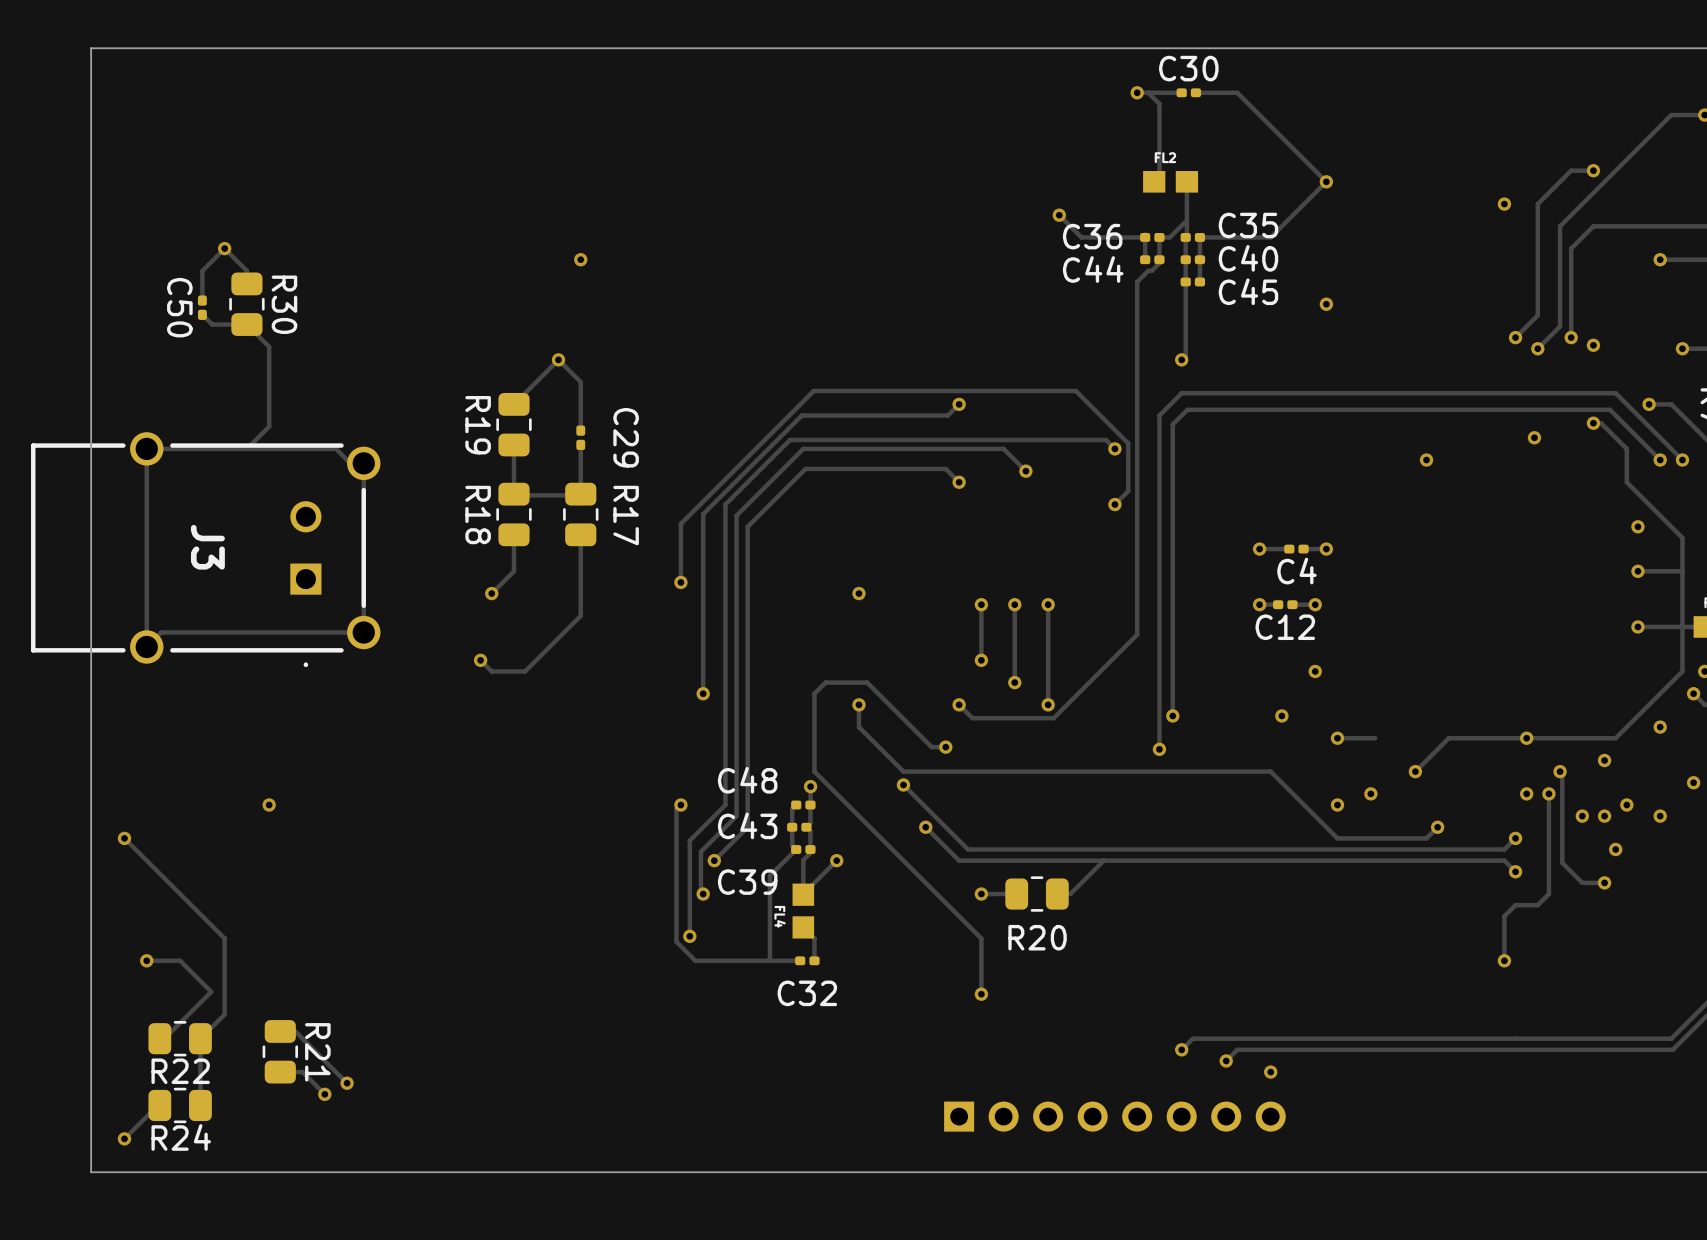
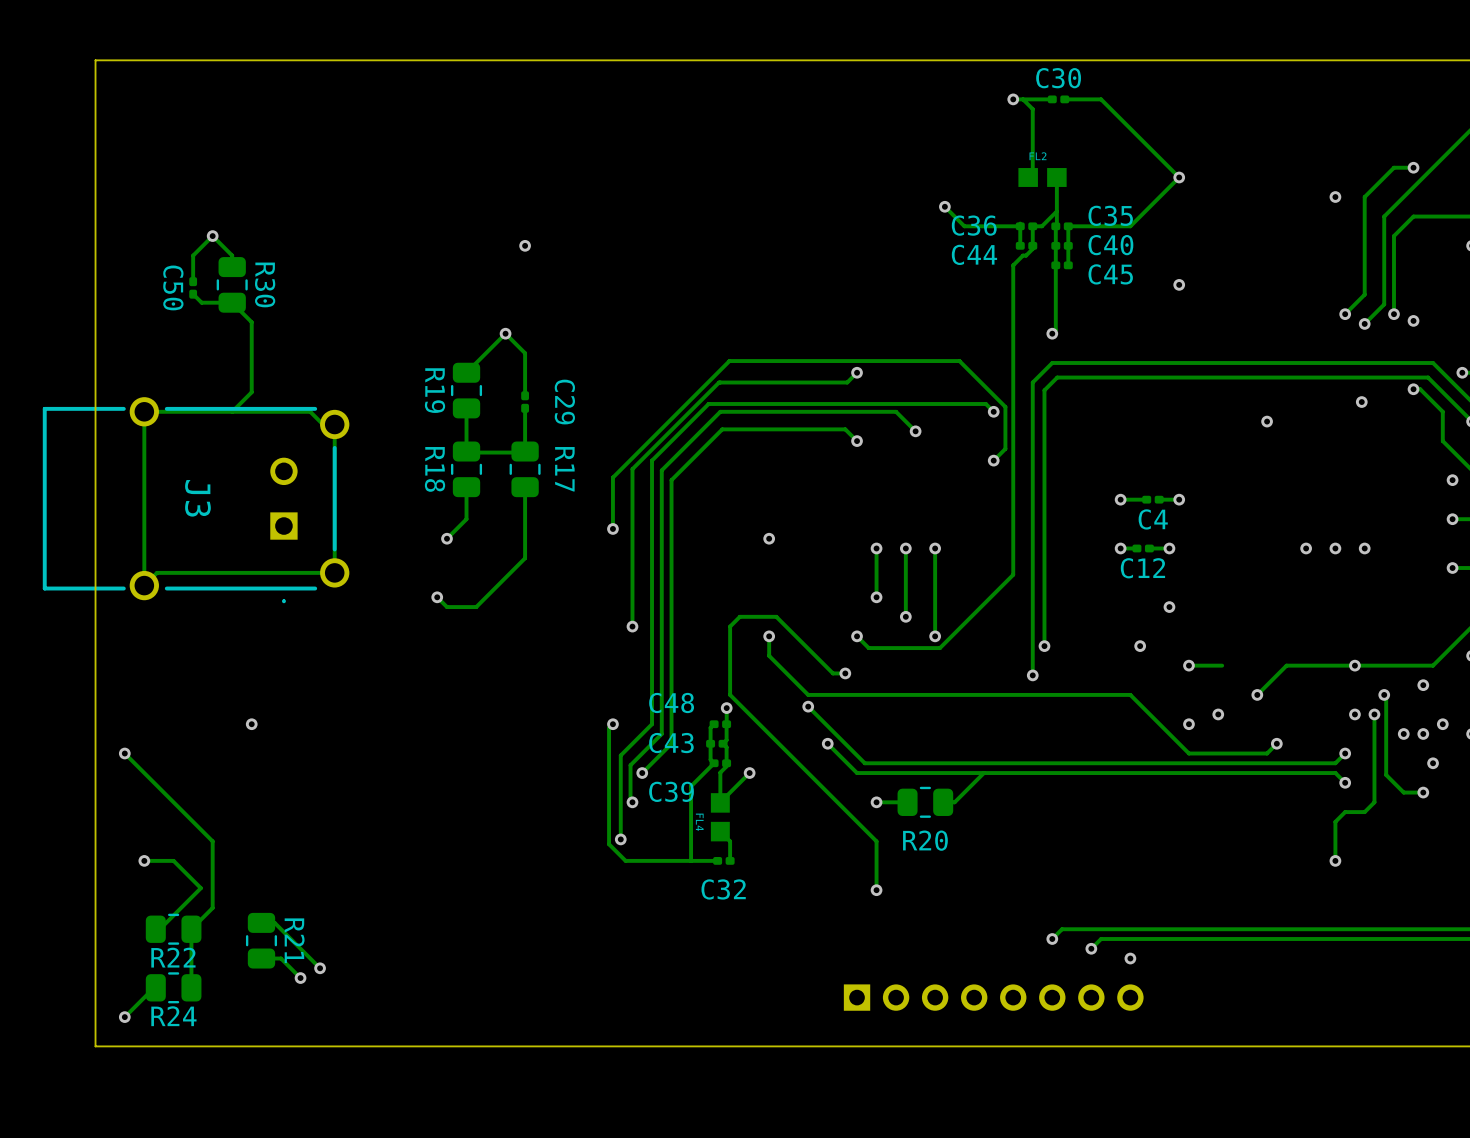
via: none -> (1306, 548)
via: none -> (1335, 548)
via: none -> (1364, 548)

